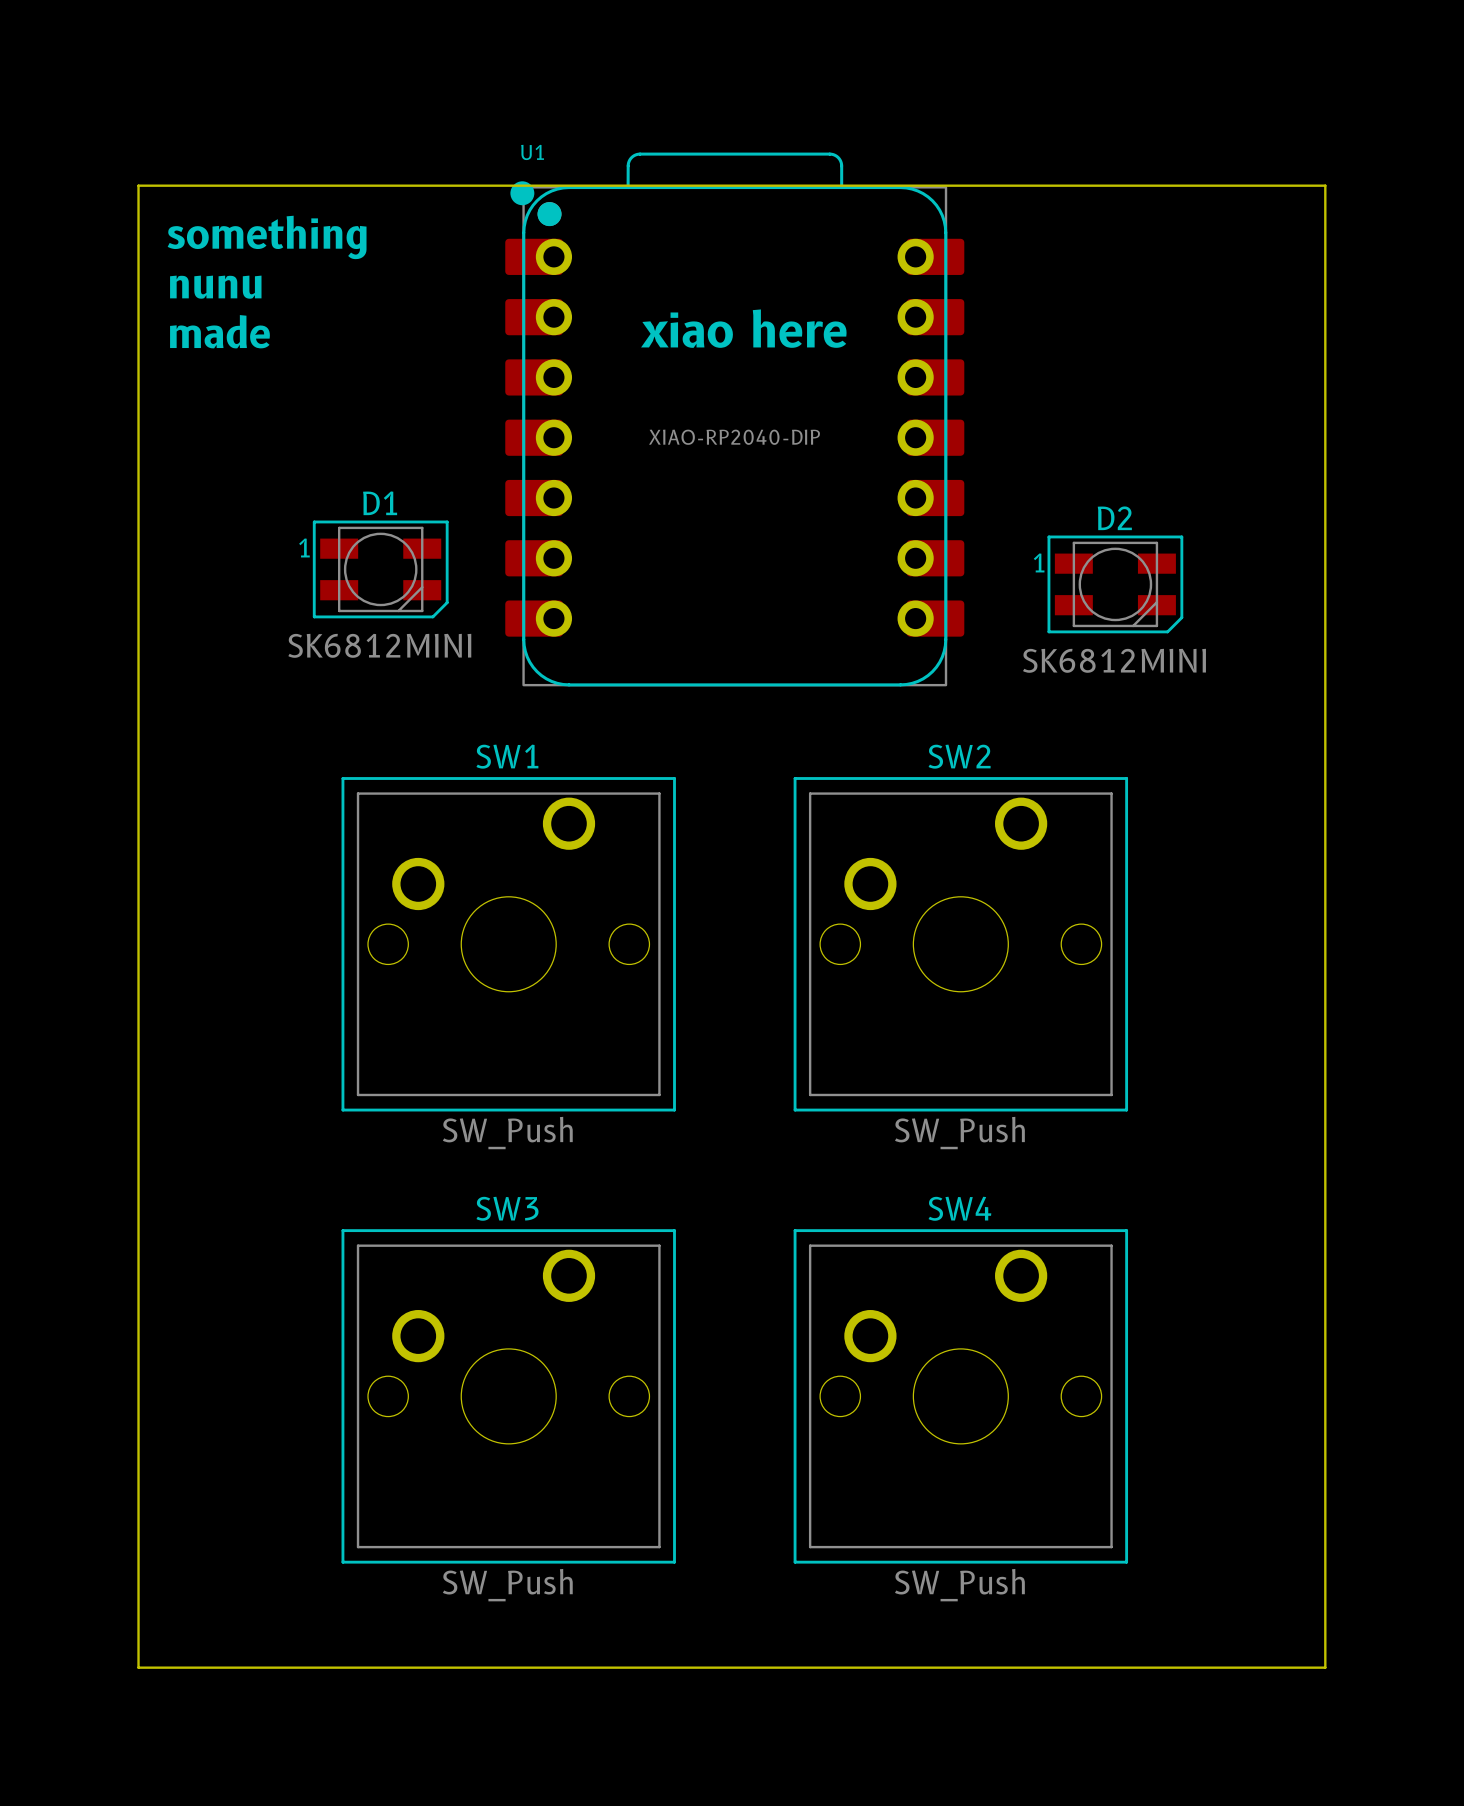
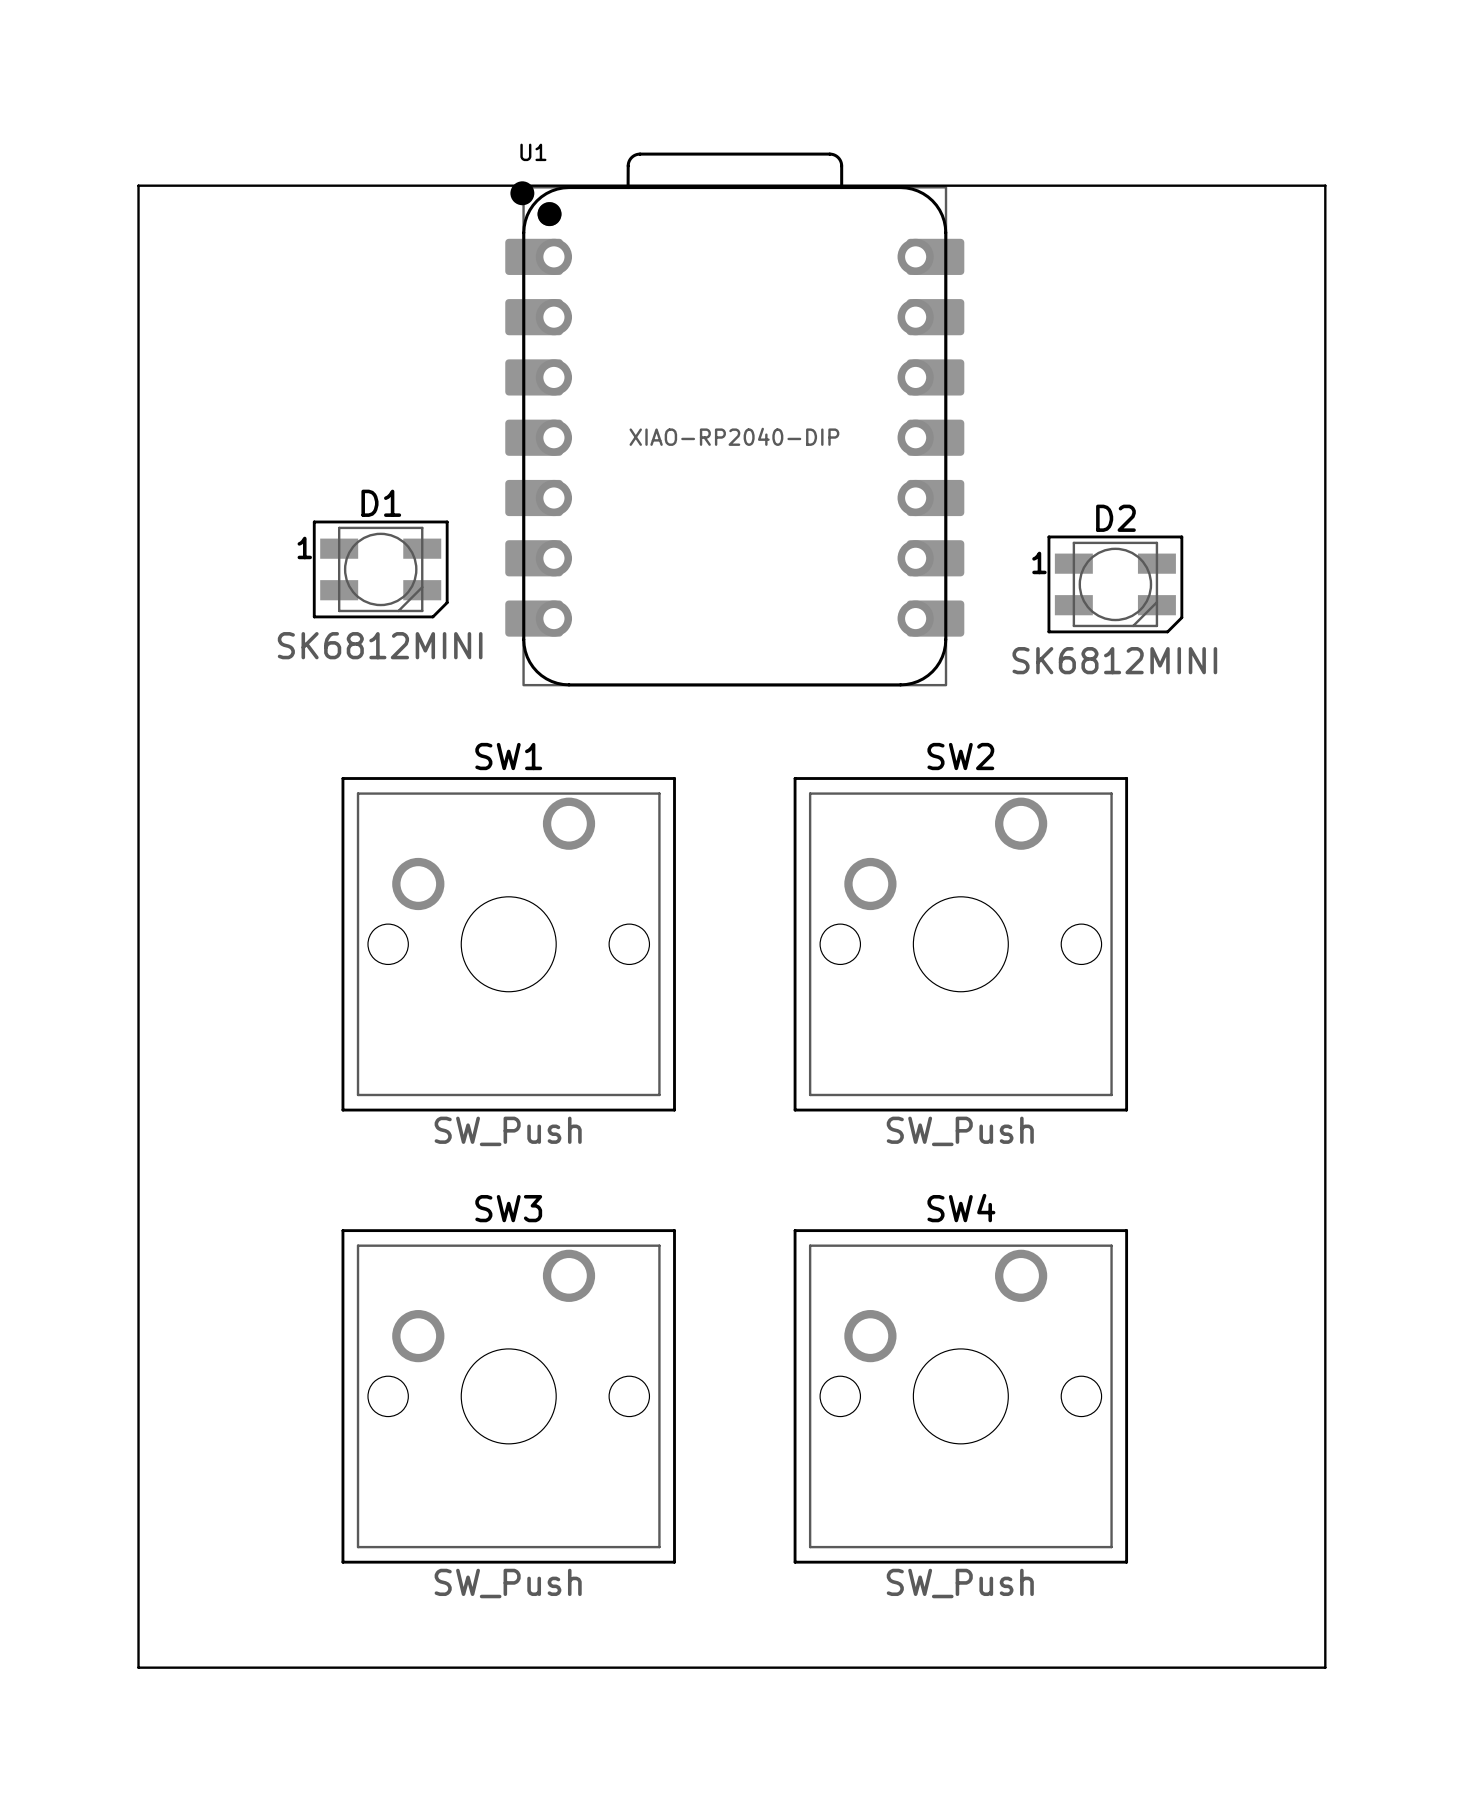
text: something (267, 237) -> none
text: nunu (215, 287) -> none
text: xiao here (743, 328) -> none
text: made (219, 331) -> none

